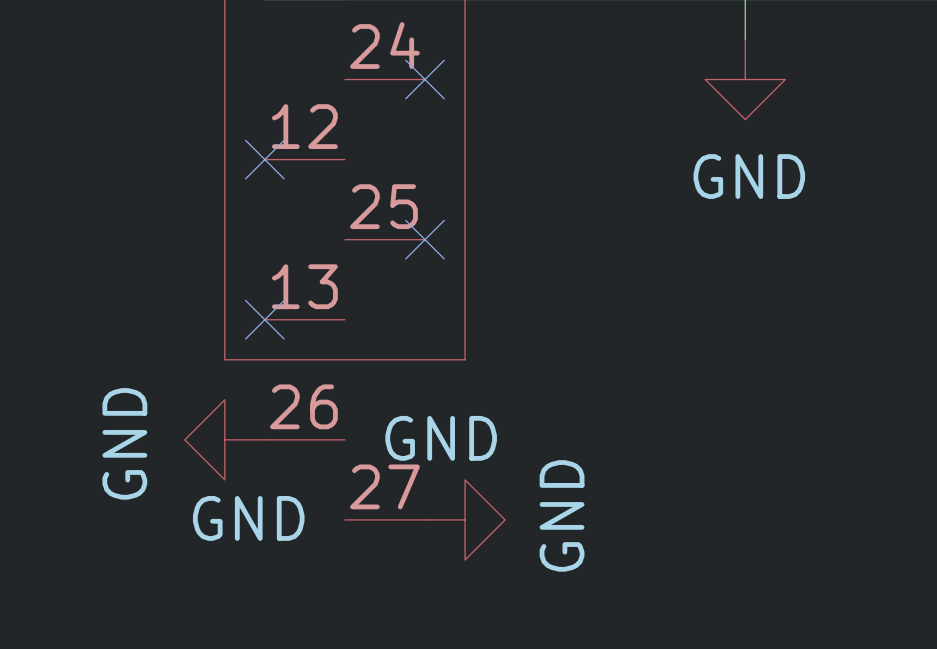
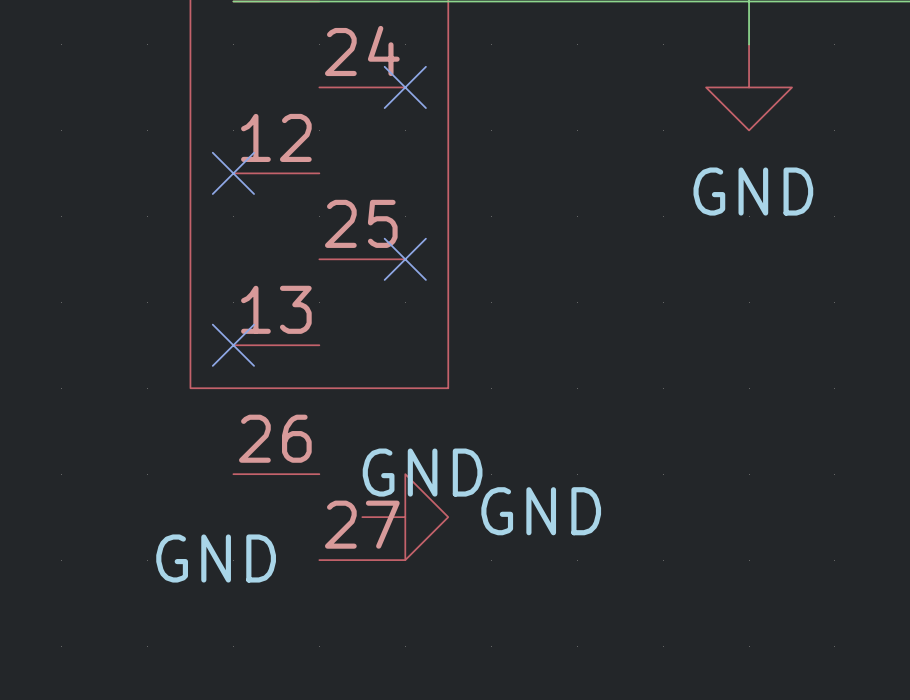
power symbol: GND (224, 439) -> none
power symbol text rotation: 0° (562, 515) -> 90° clockwise (541, 511)
power symbol position: GND (465, 519) -> GND (405, 517)

